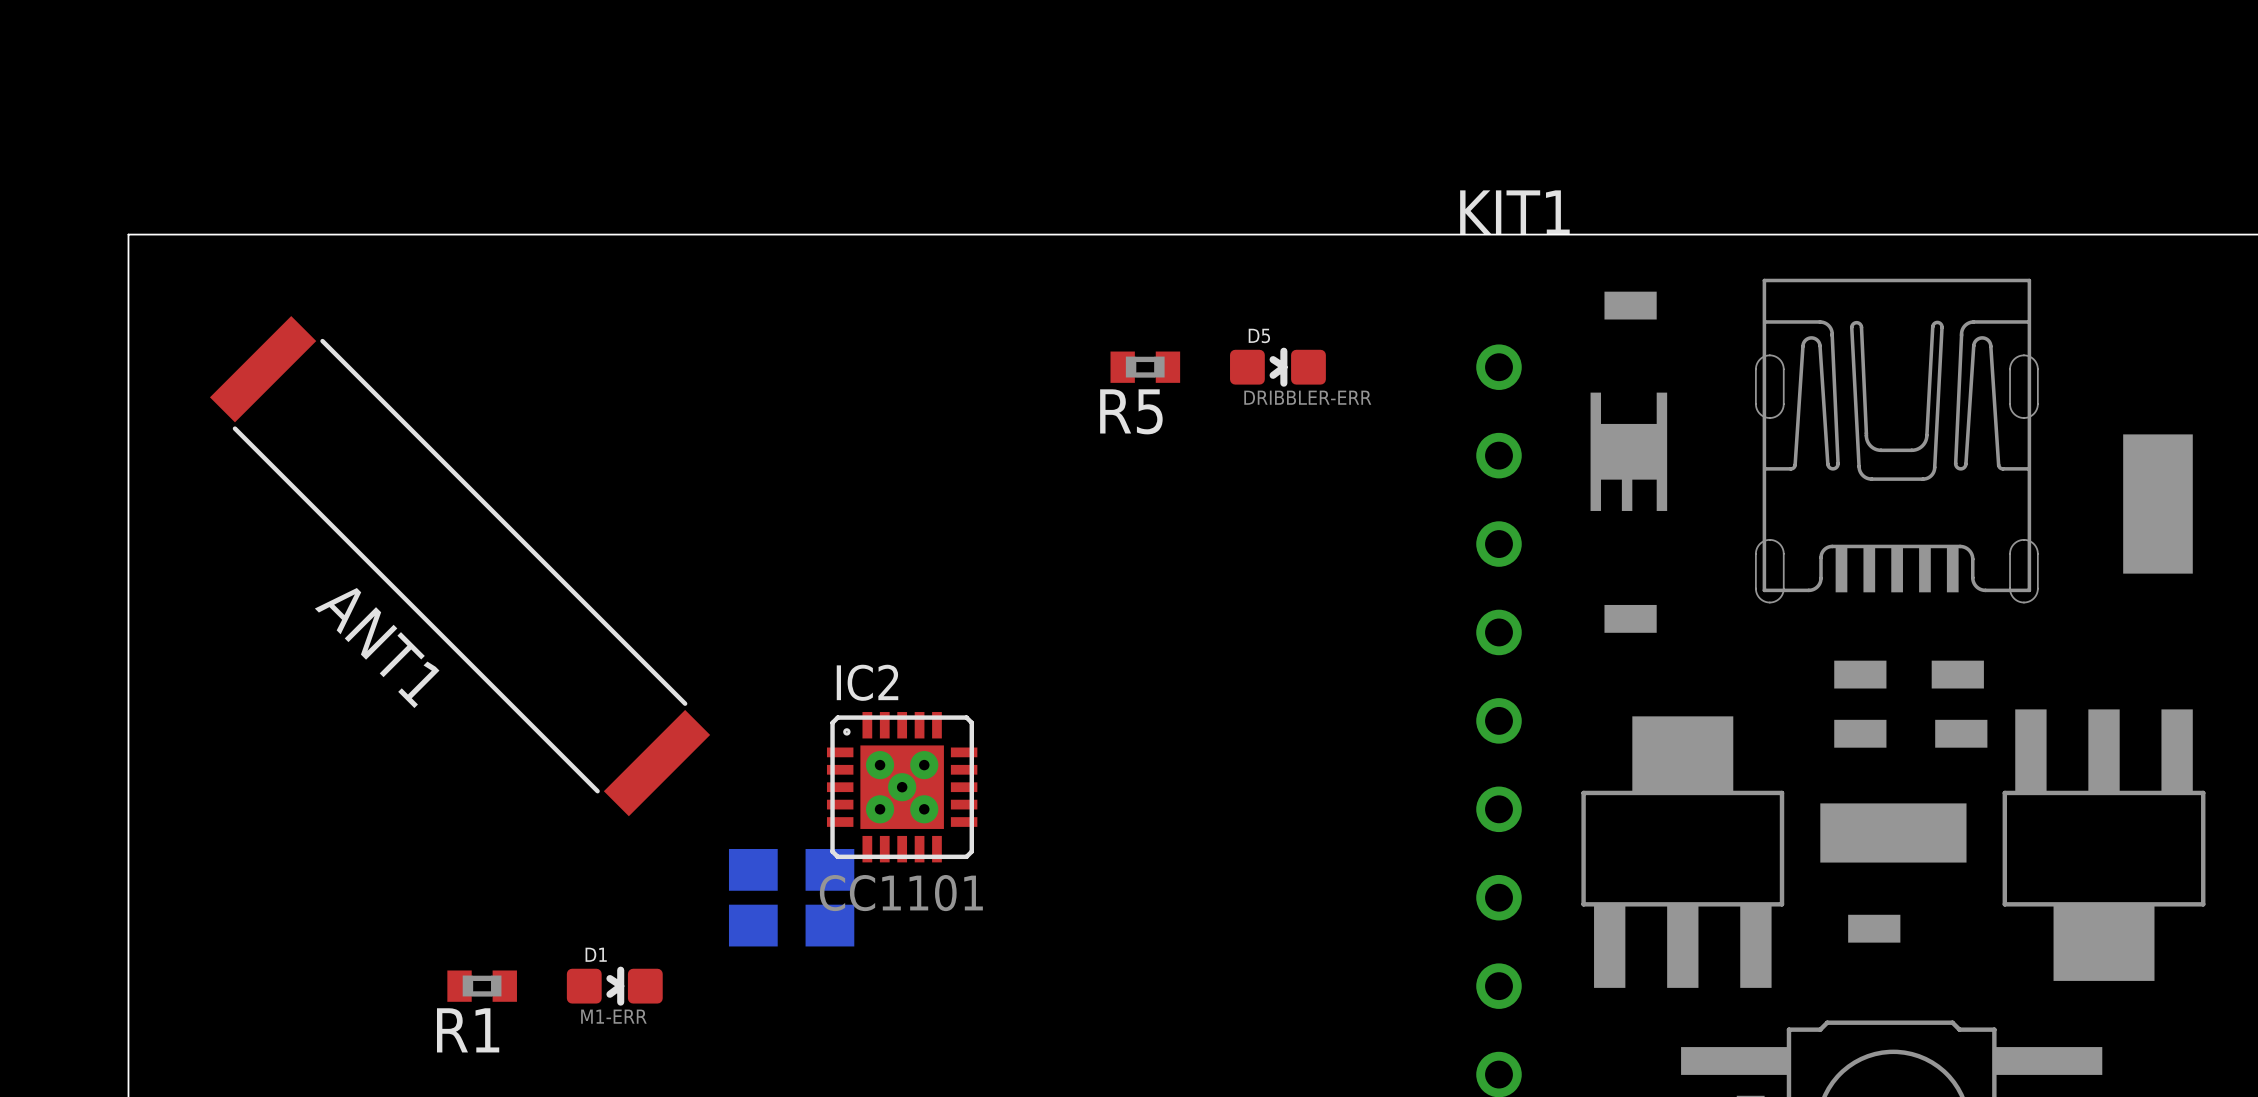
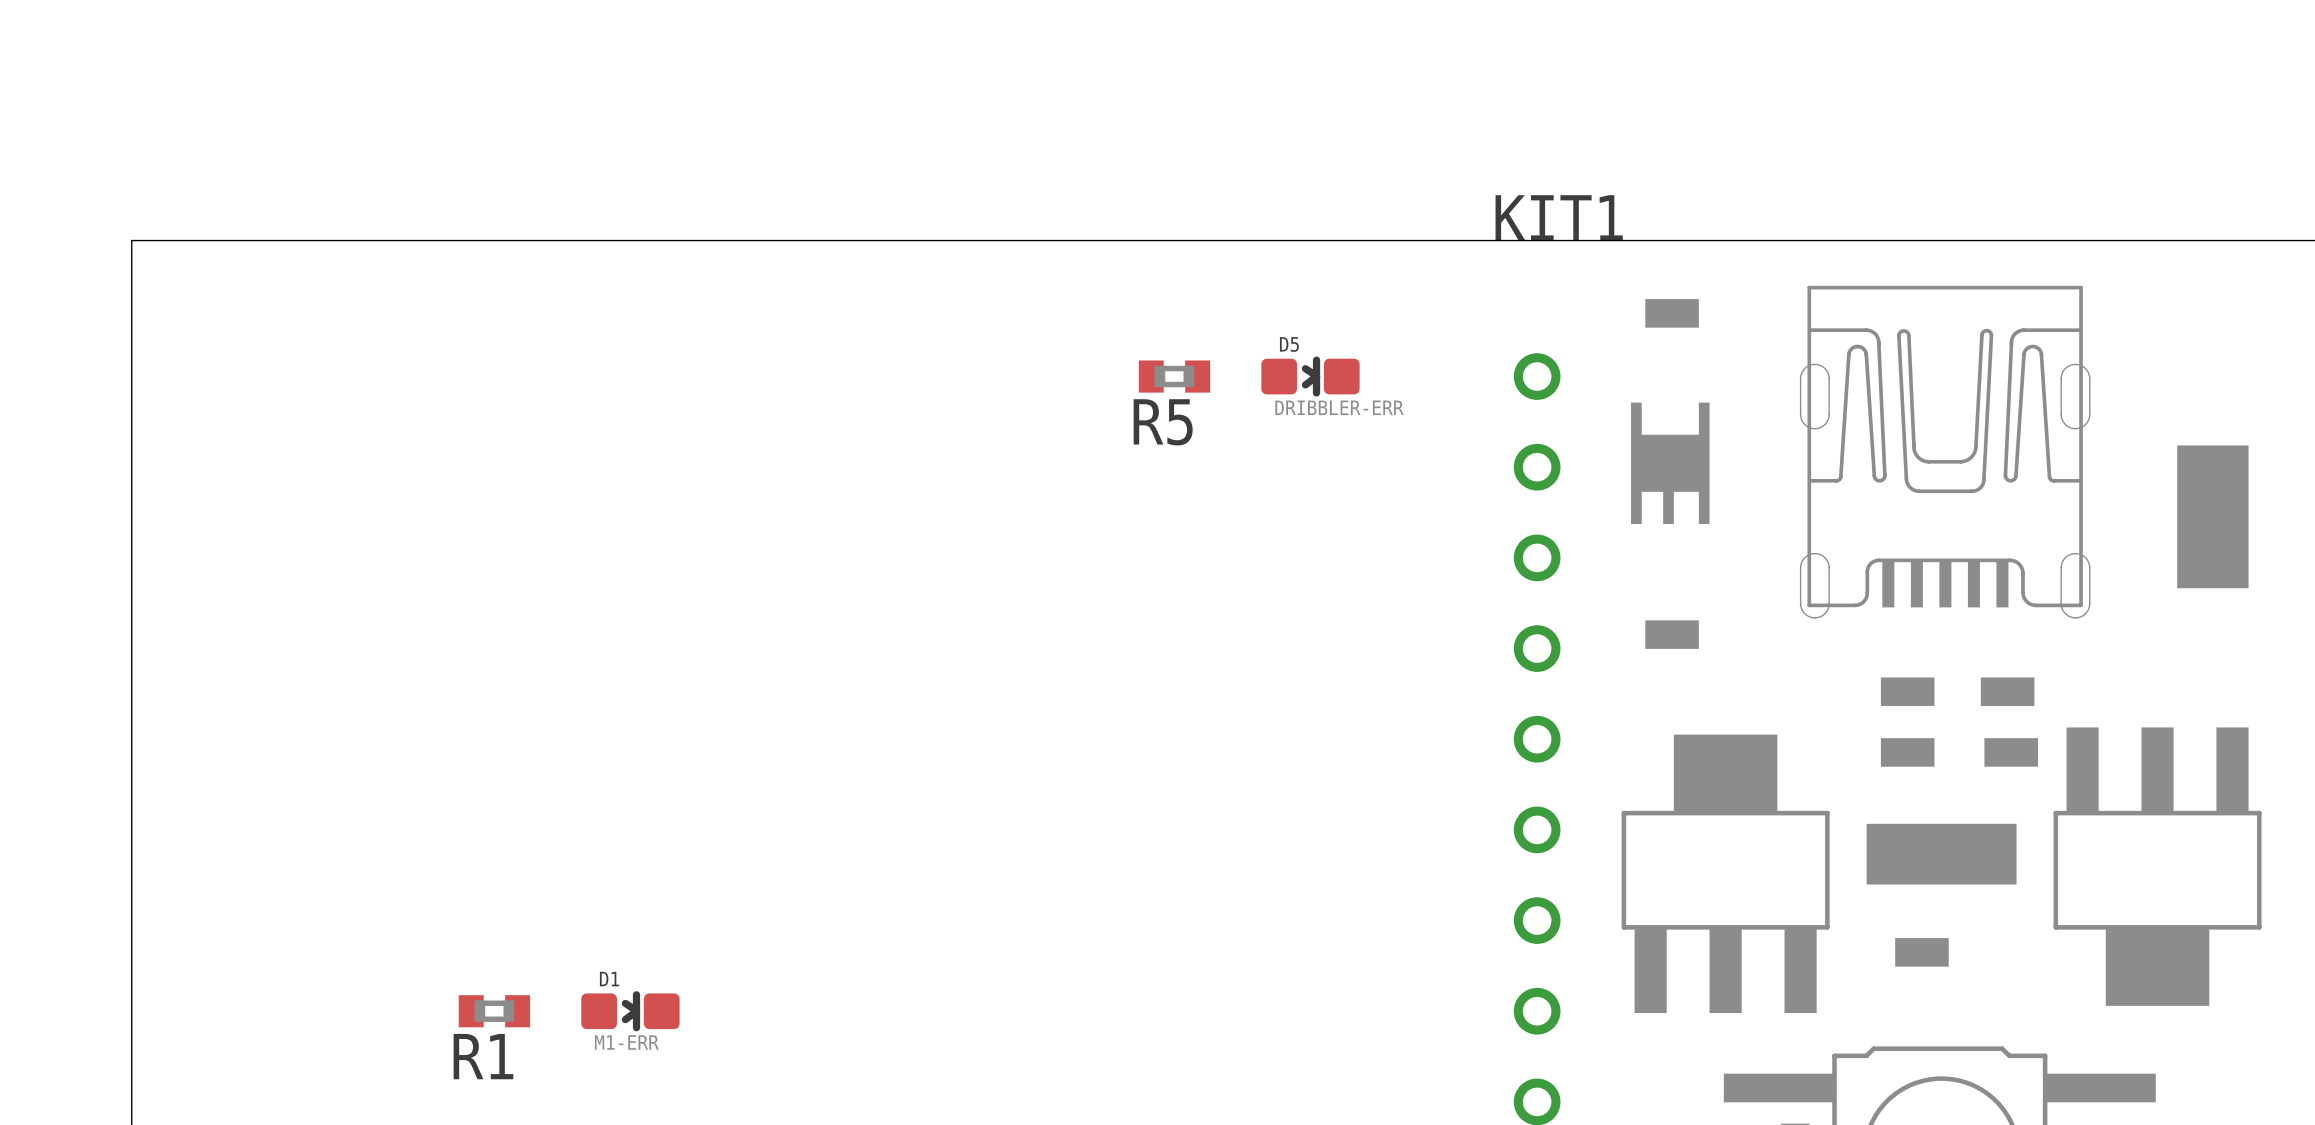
ANT1: (460, 566) -> none
IC2: CC1101 (902, 787) -> none
part: (791, 897) -> none

